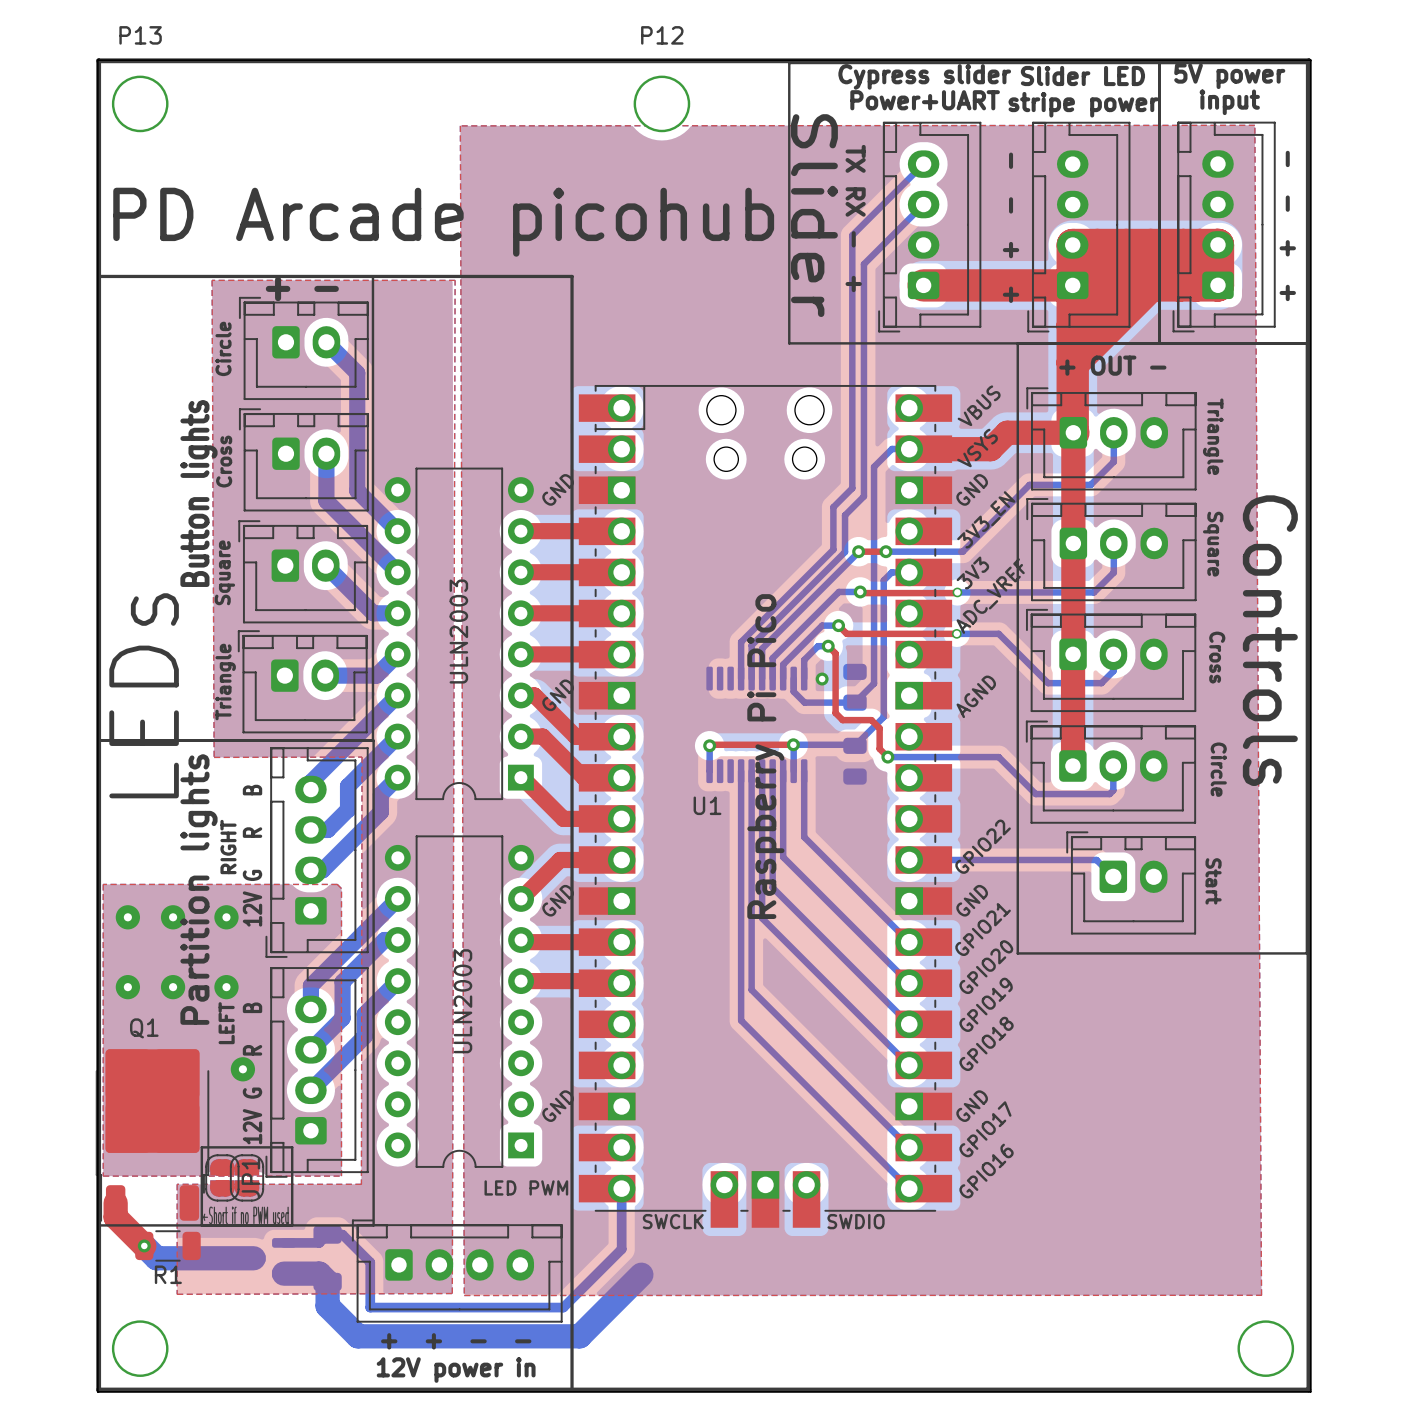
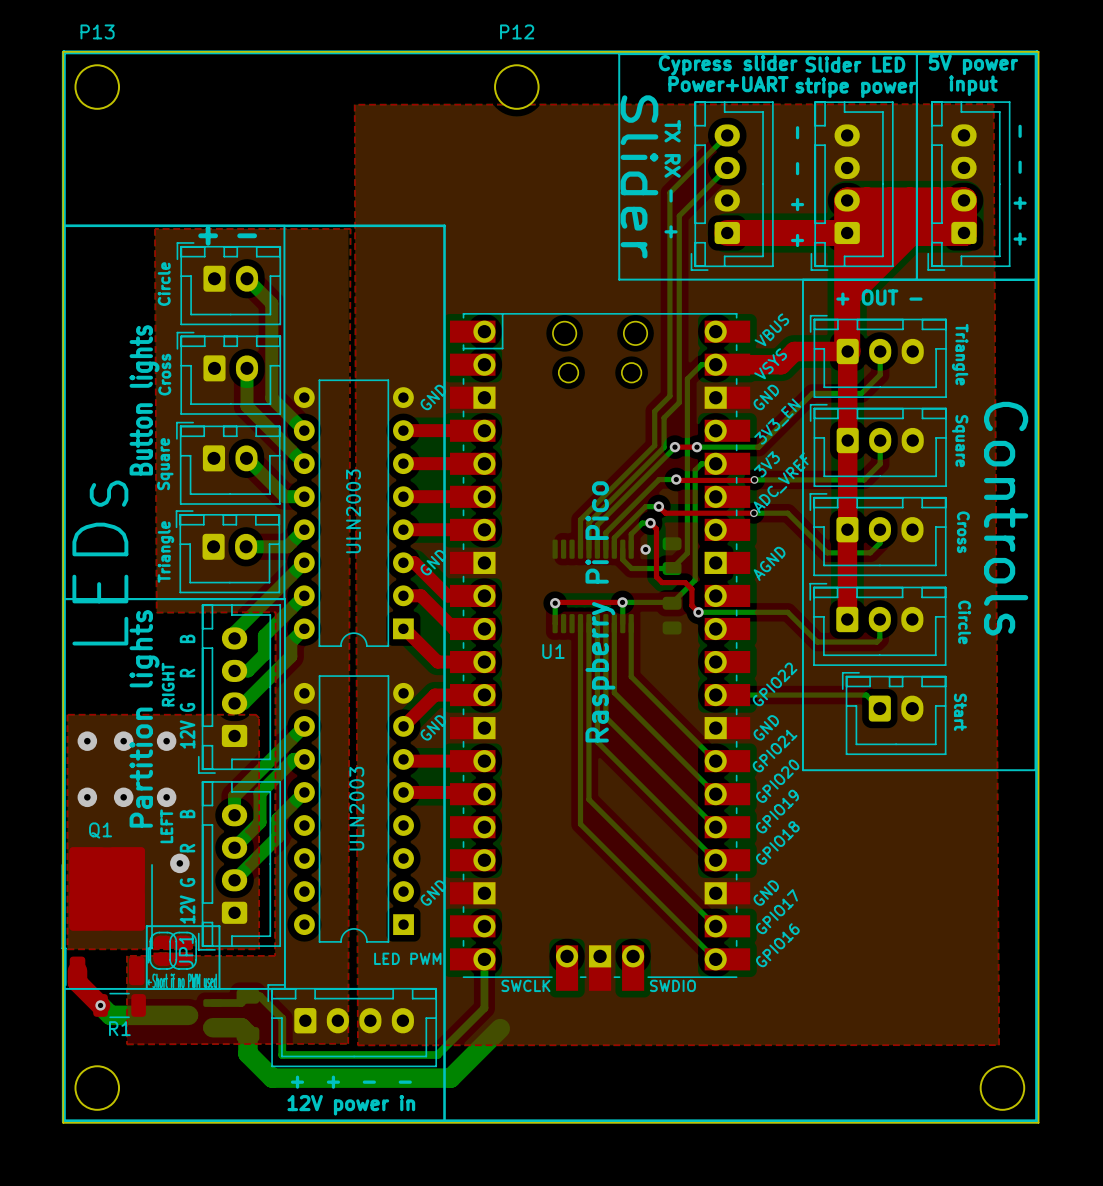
text: PD Arcade picohub (443, 222) -> none

